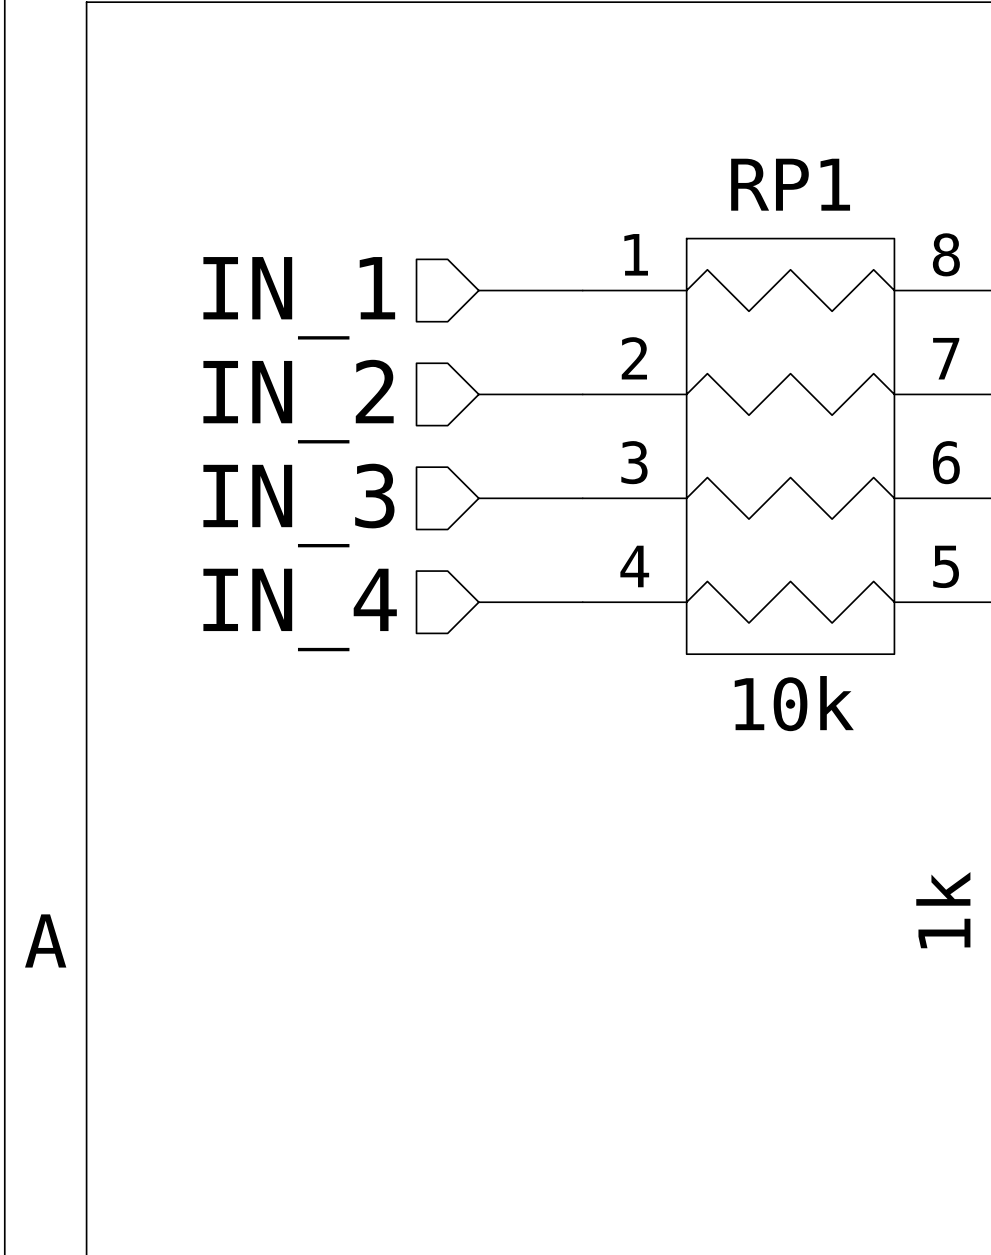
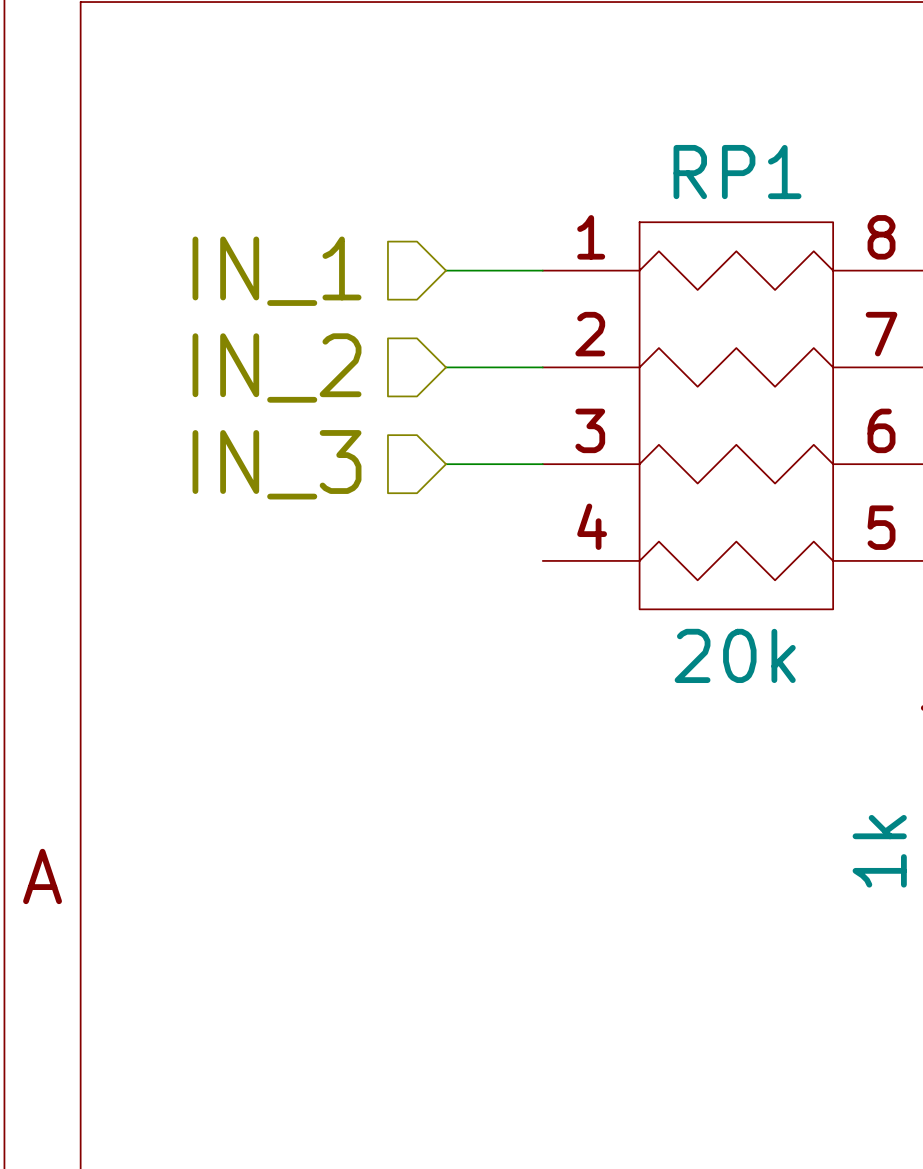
wire: (478, 602) (582, 602) -> none
hierarchical label: IN_4 (300, 609) -> none
RP1 value: 10k (794, 703) -> 20k (735, 655)

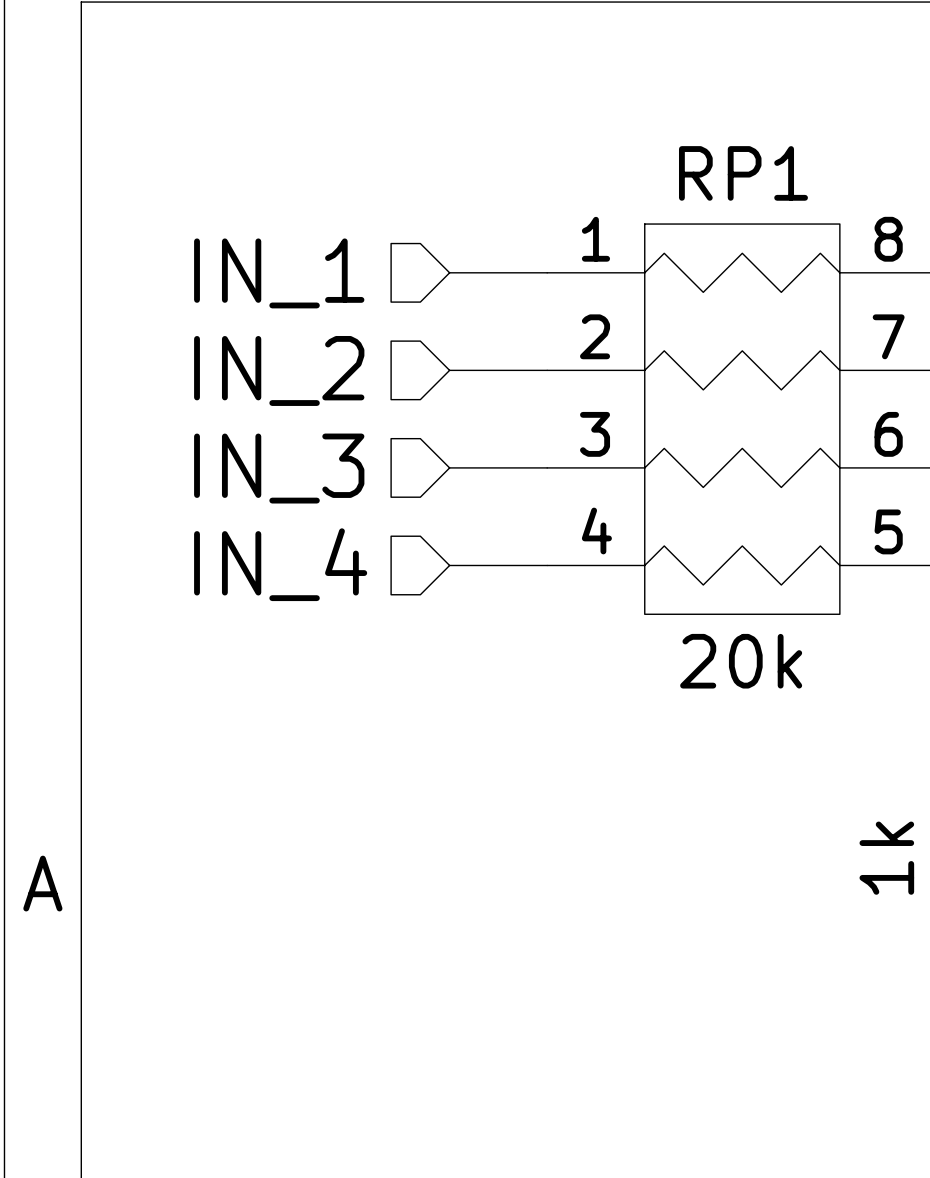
hierarchical label: none -> IN_4 (280, 564)
wire: none -> (449, 565) (547, 565)

